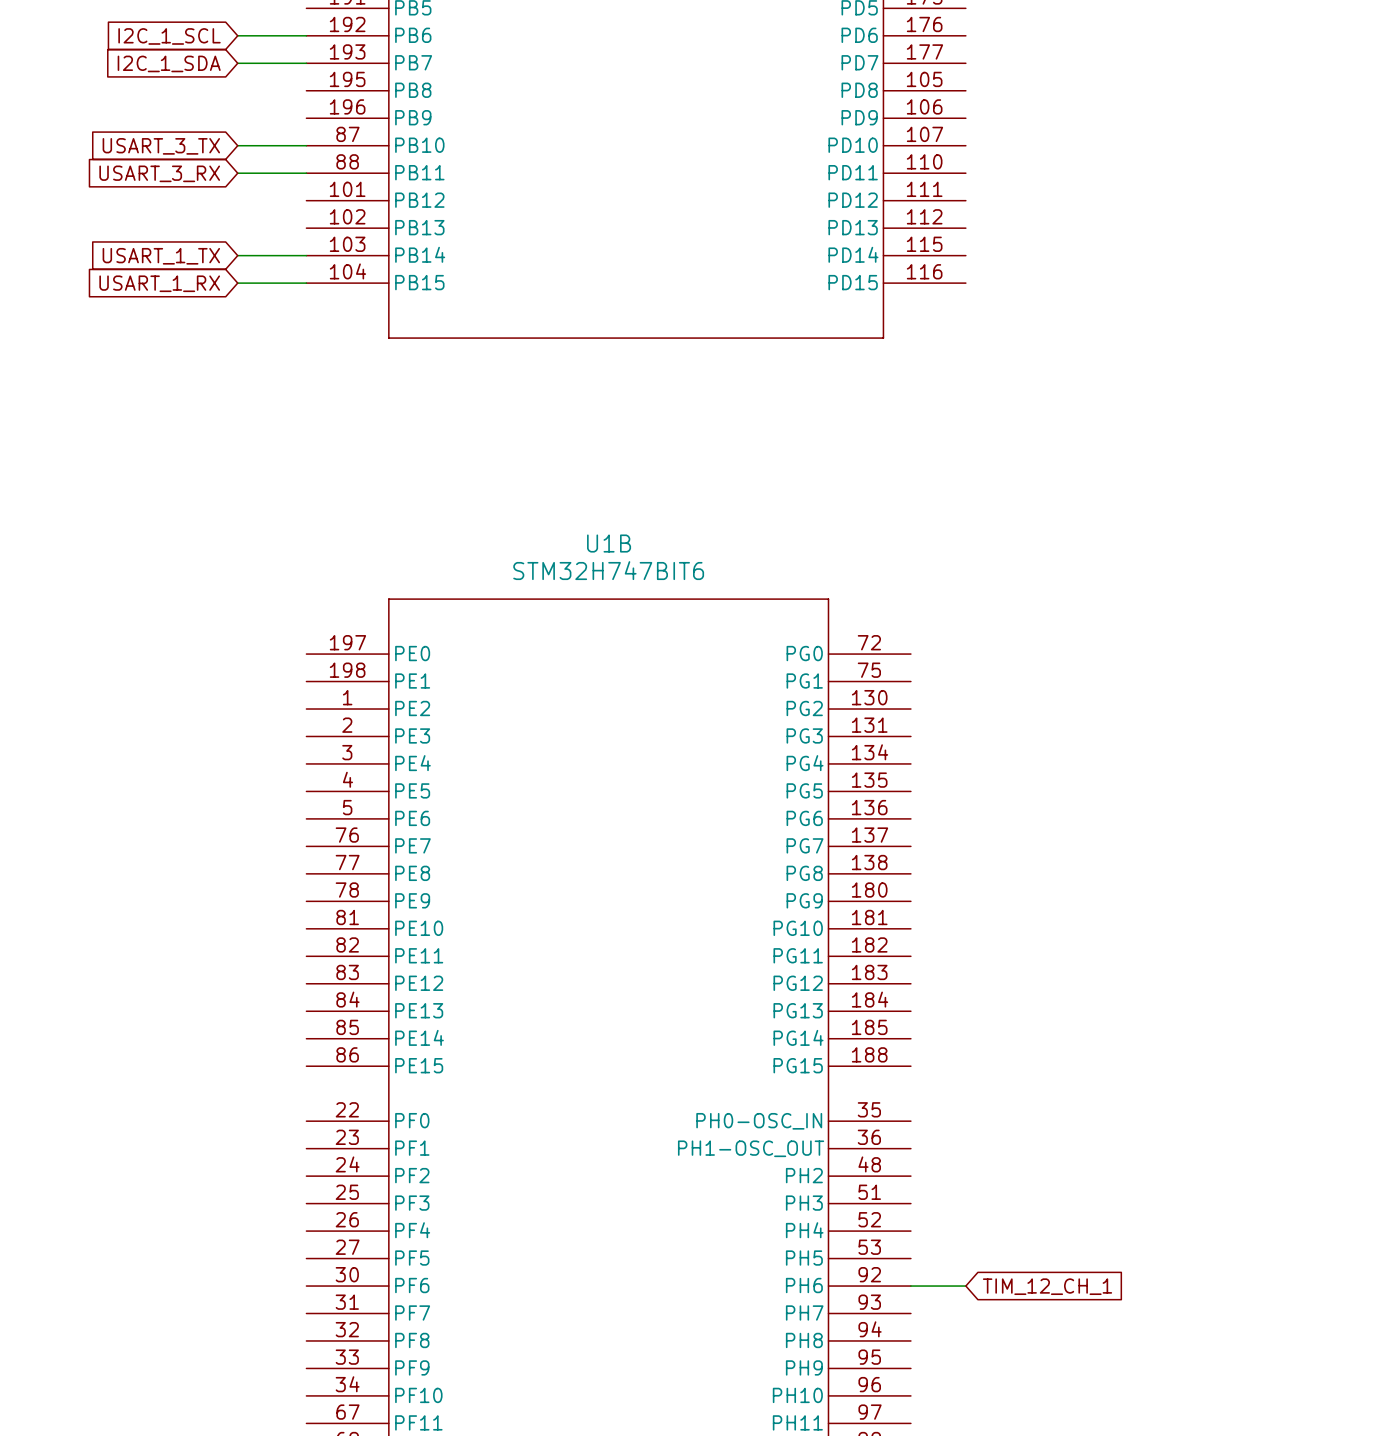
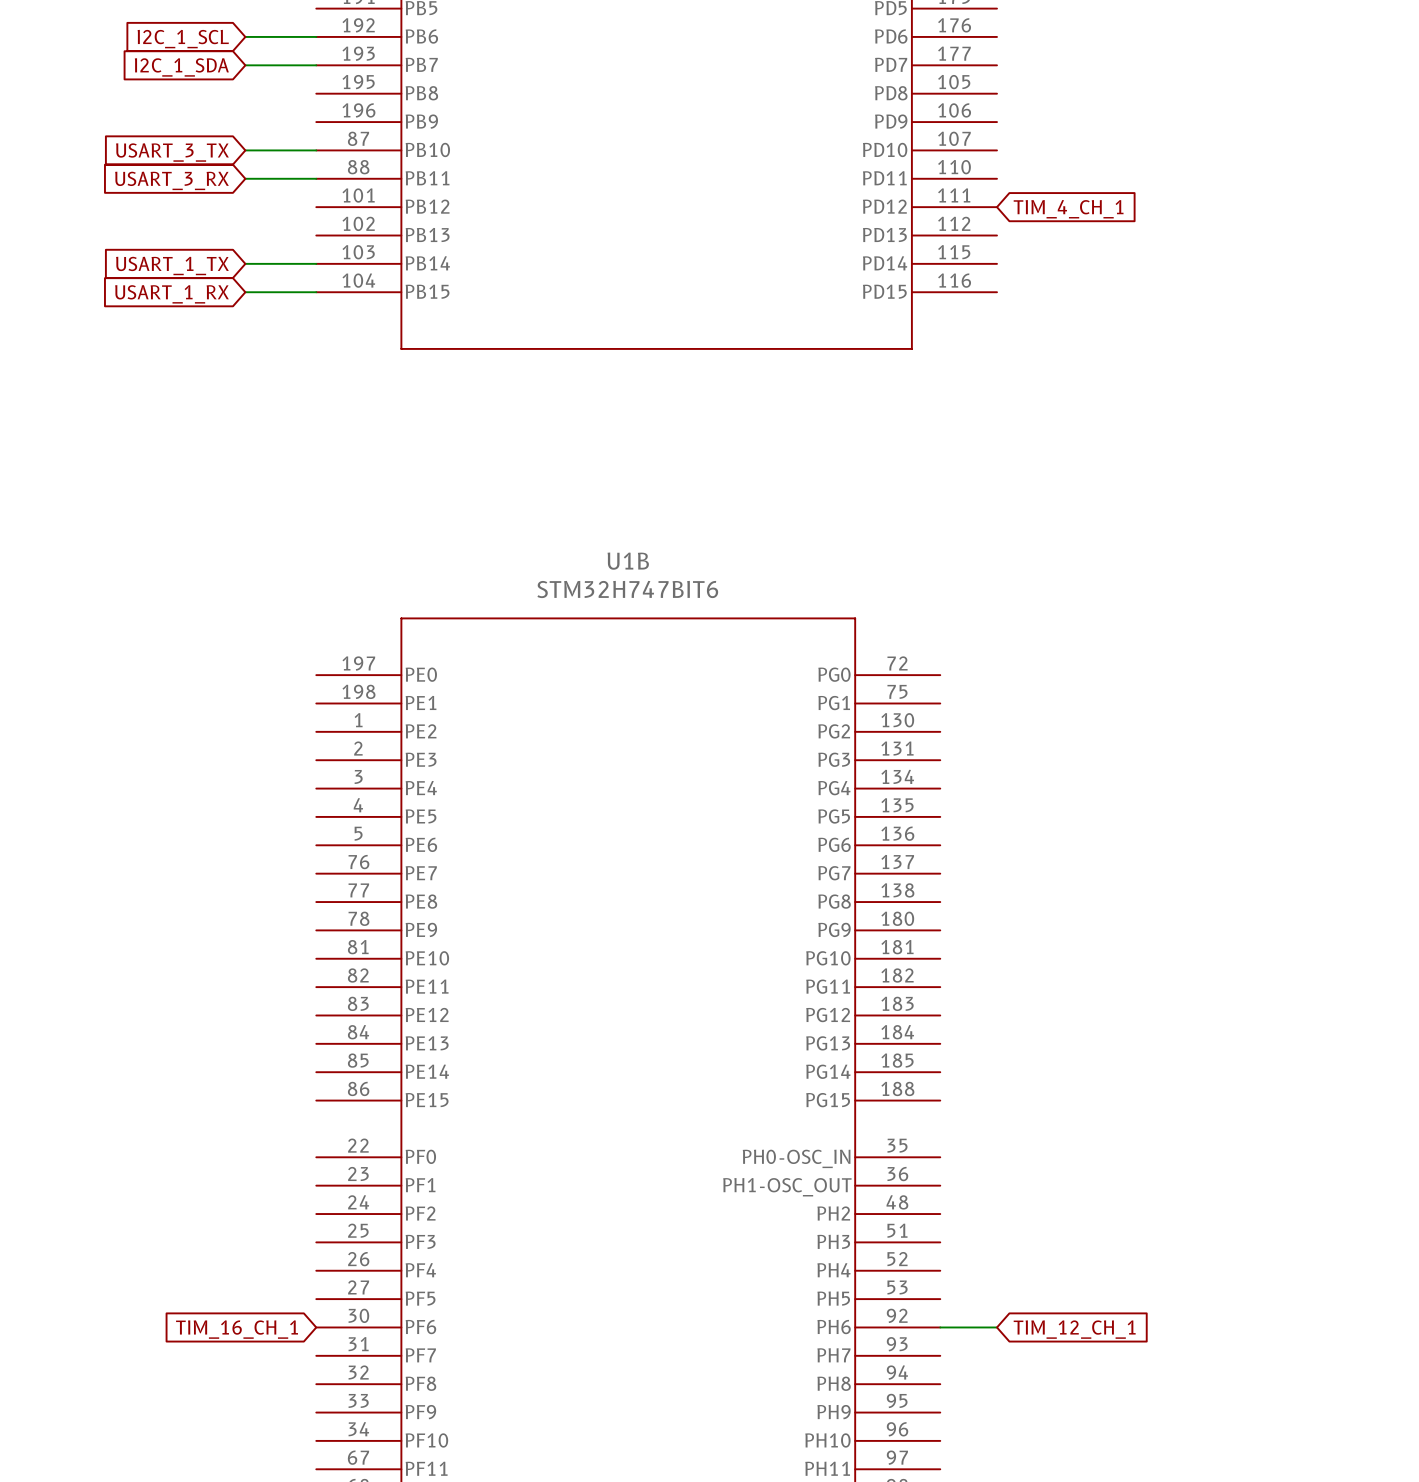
global label: none -> TIM_4_CH_1 (1068, 209)
global label: none -> TIM_16_CH_1 (237, 1329)

